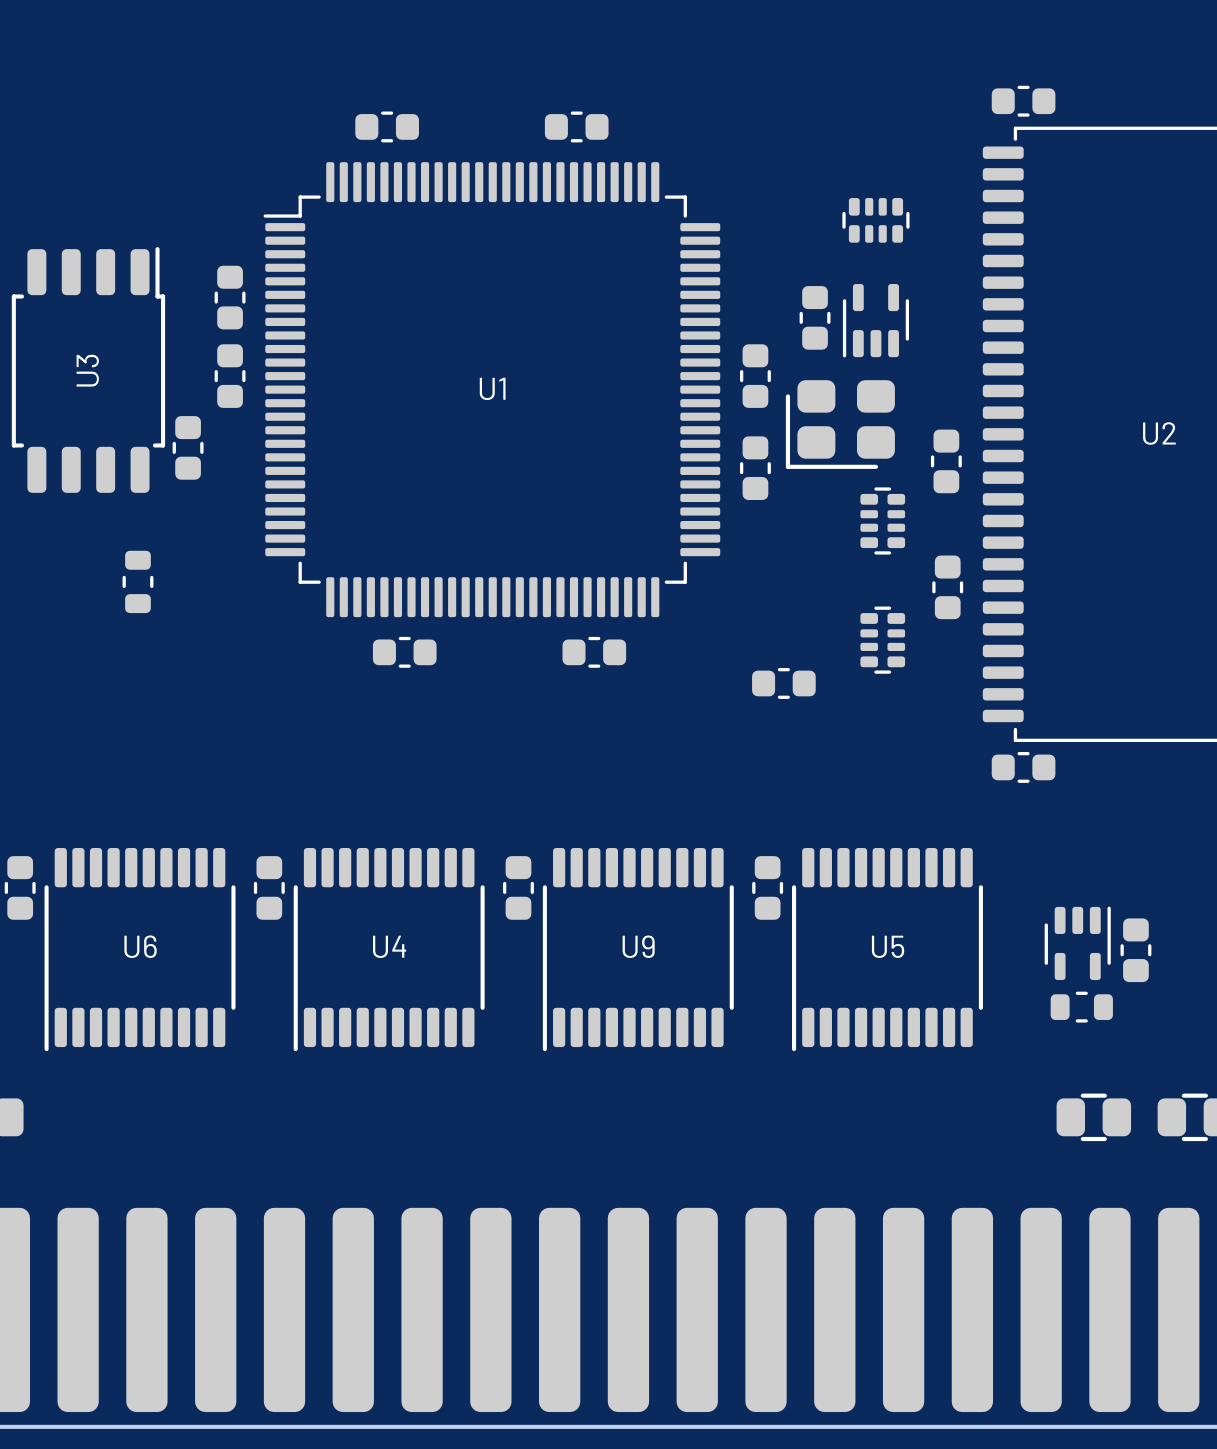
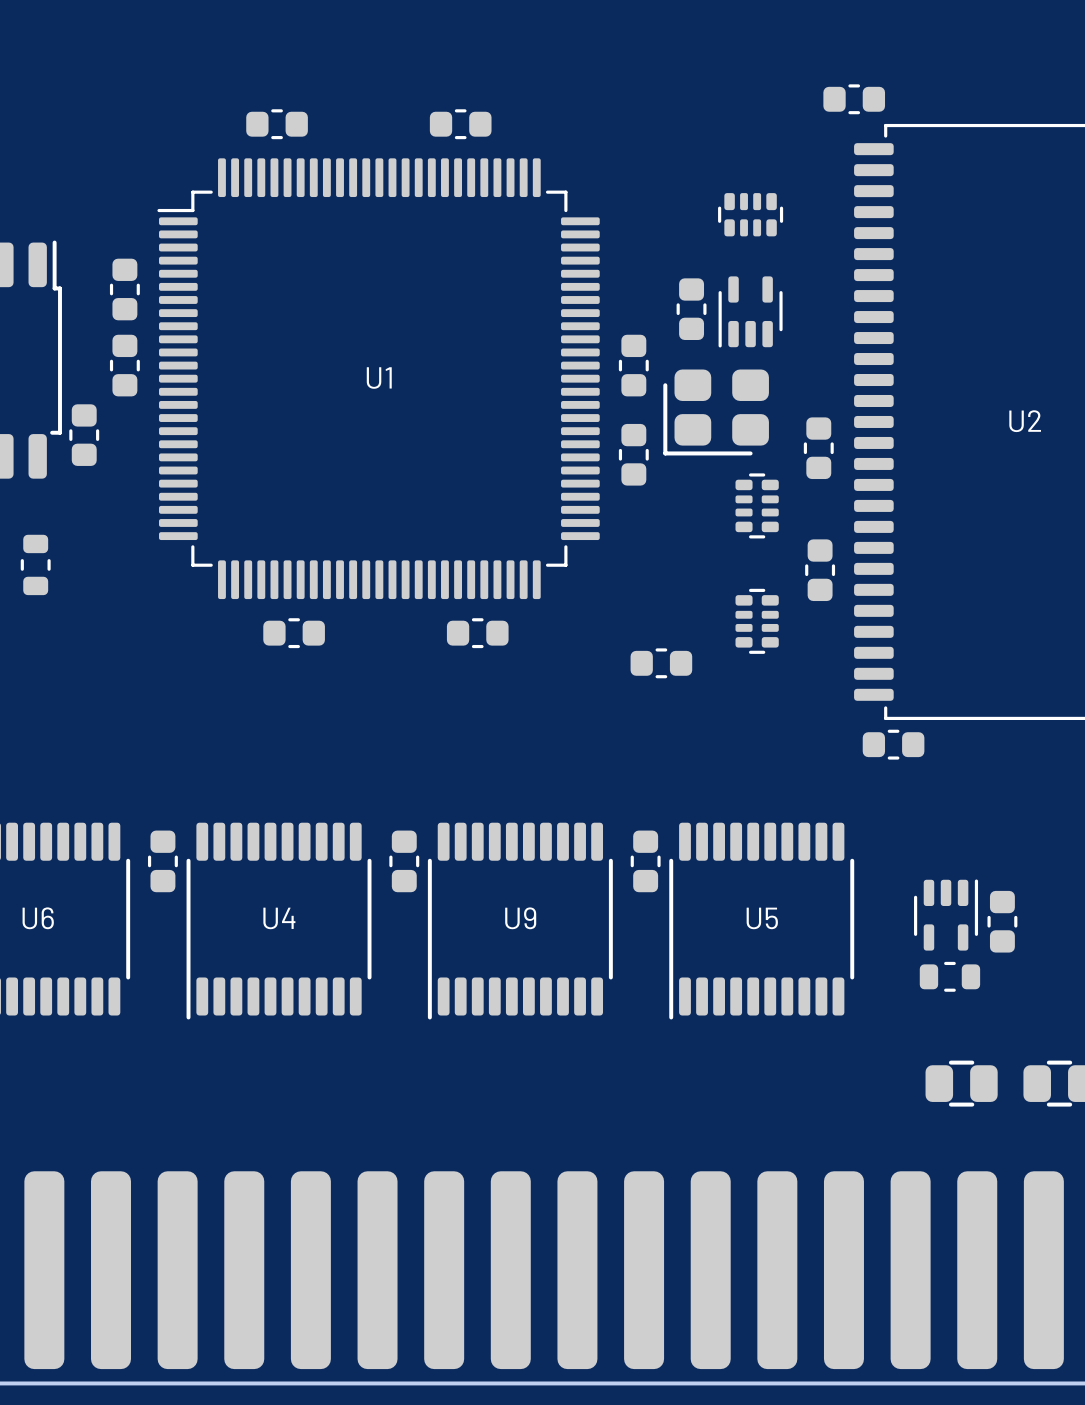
part position: (1023, 101) -> (854, 99)

